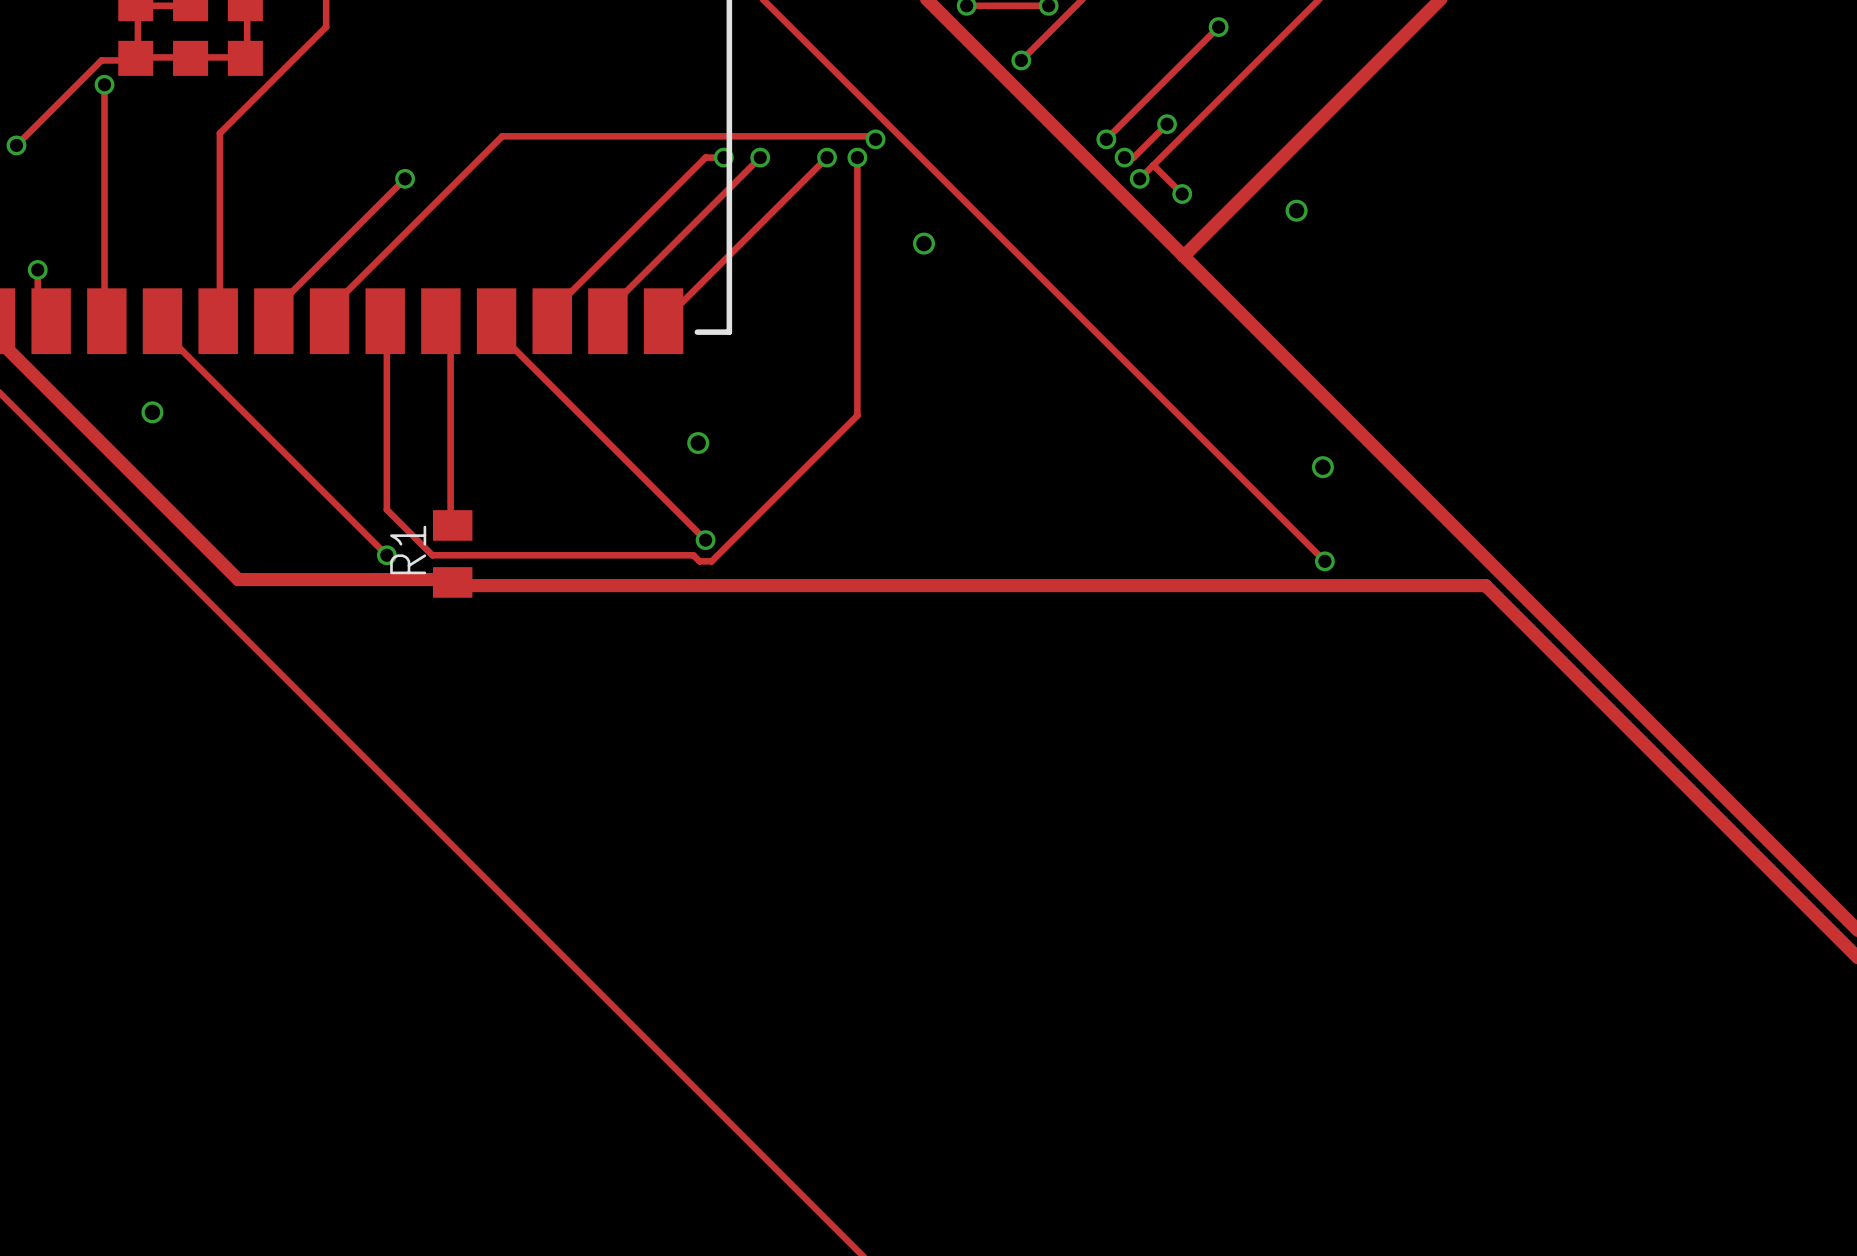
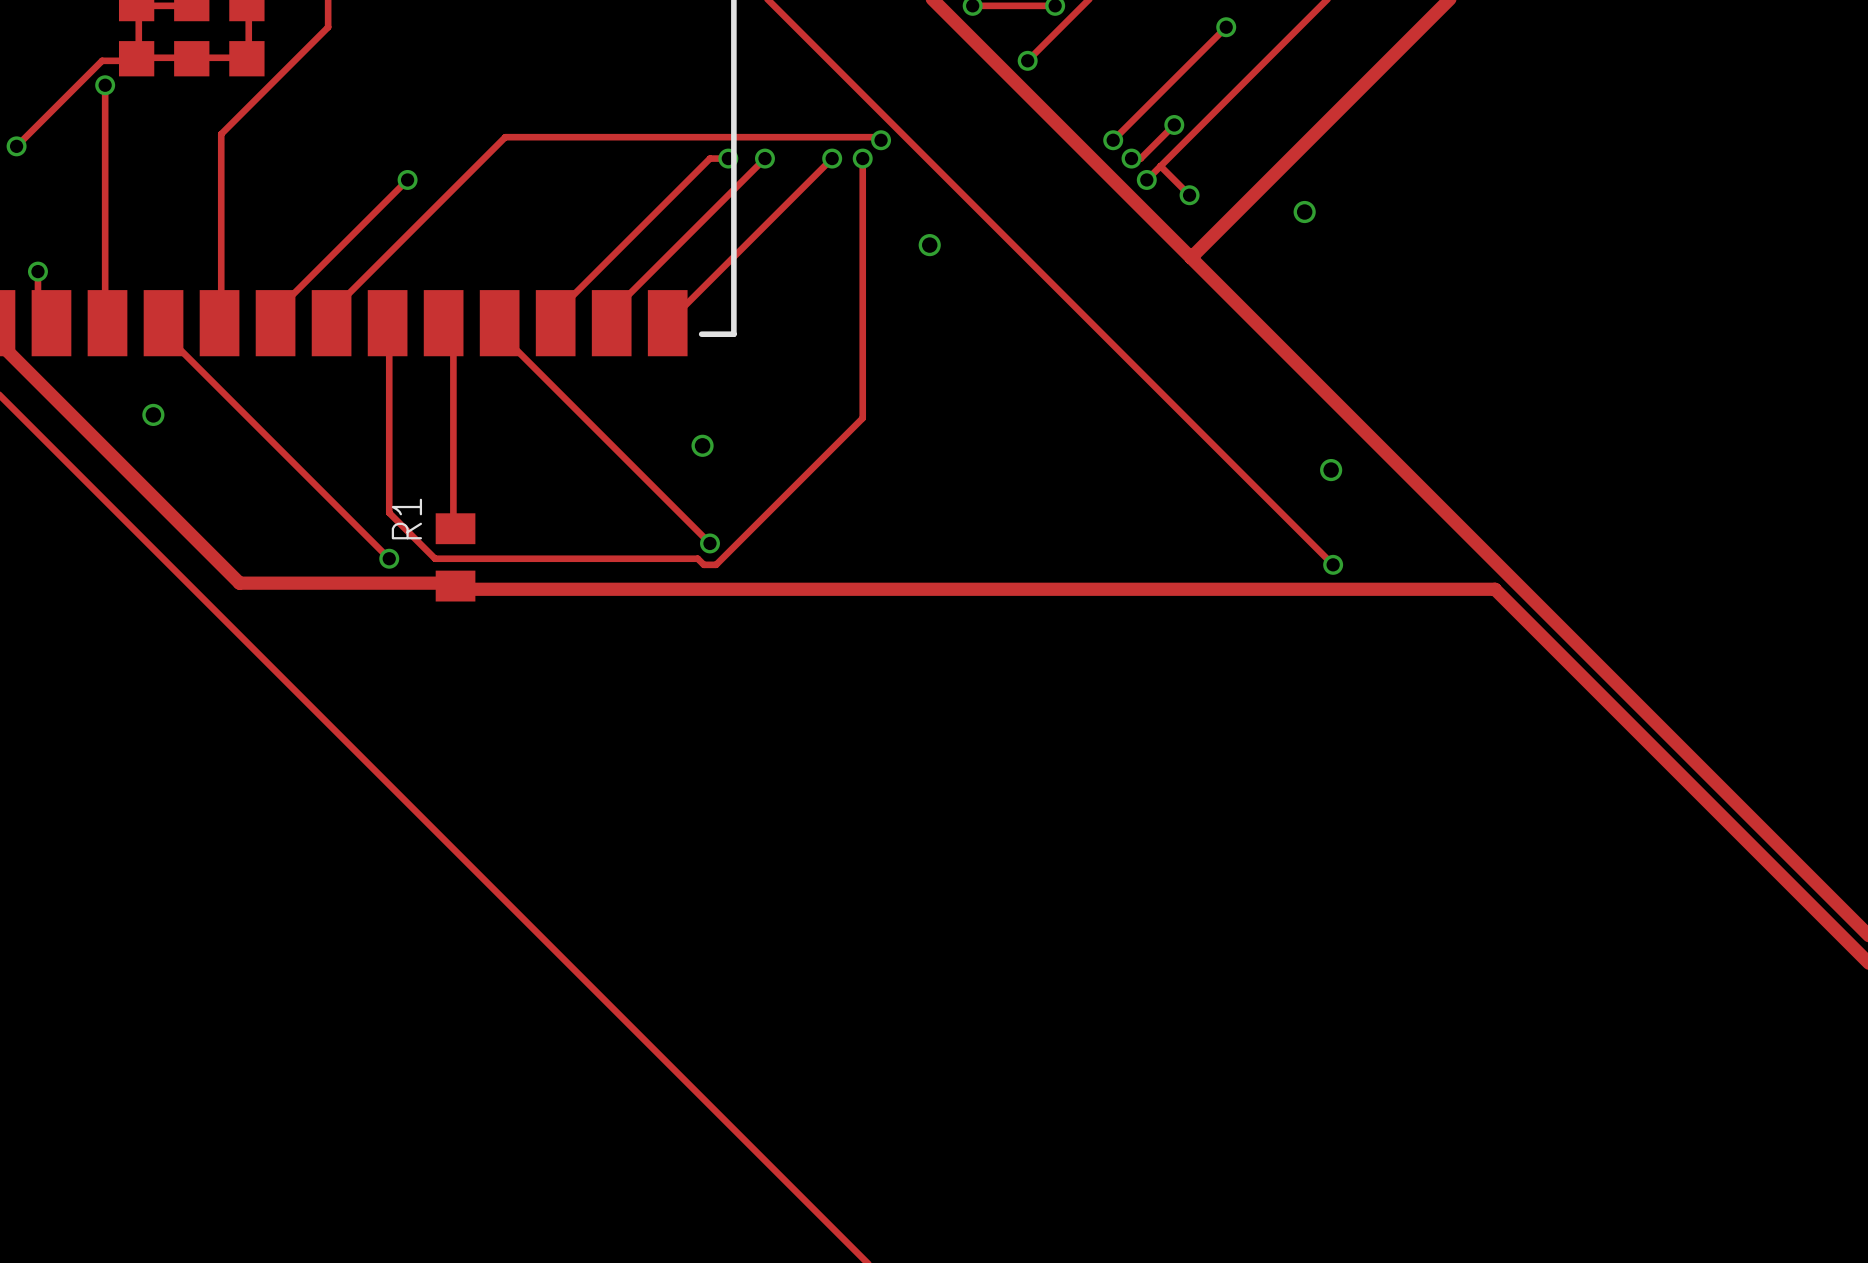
R1 name position: R1 (408, 549) -> R1 (406, 519)

